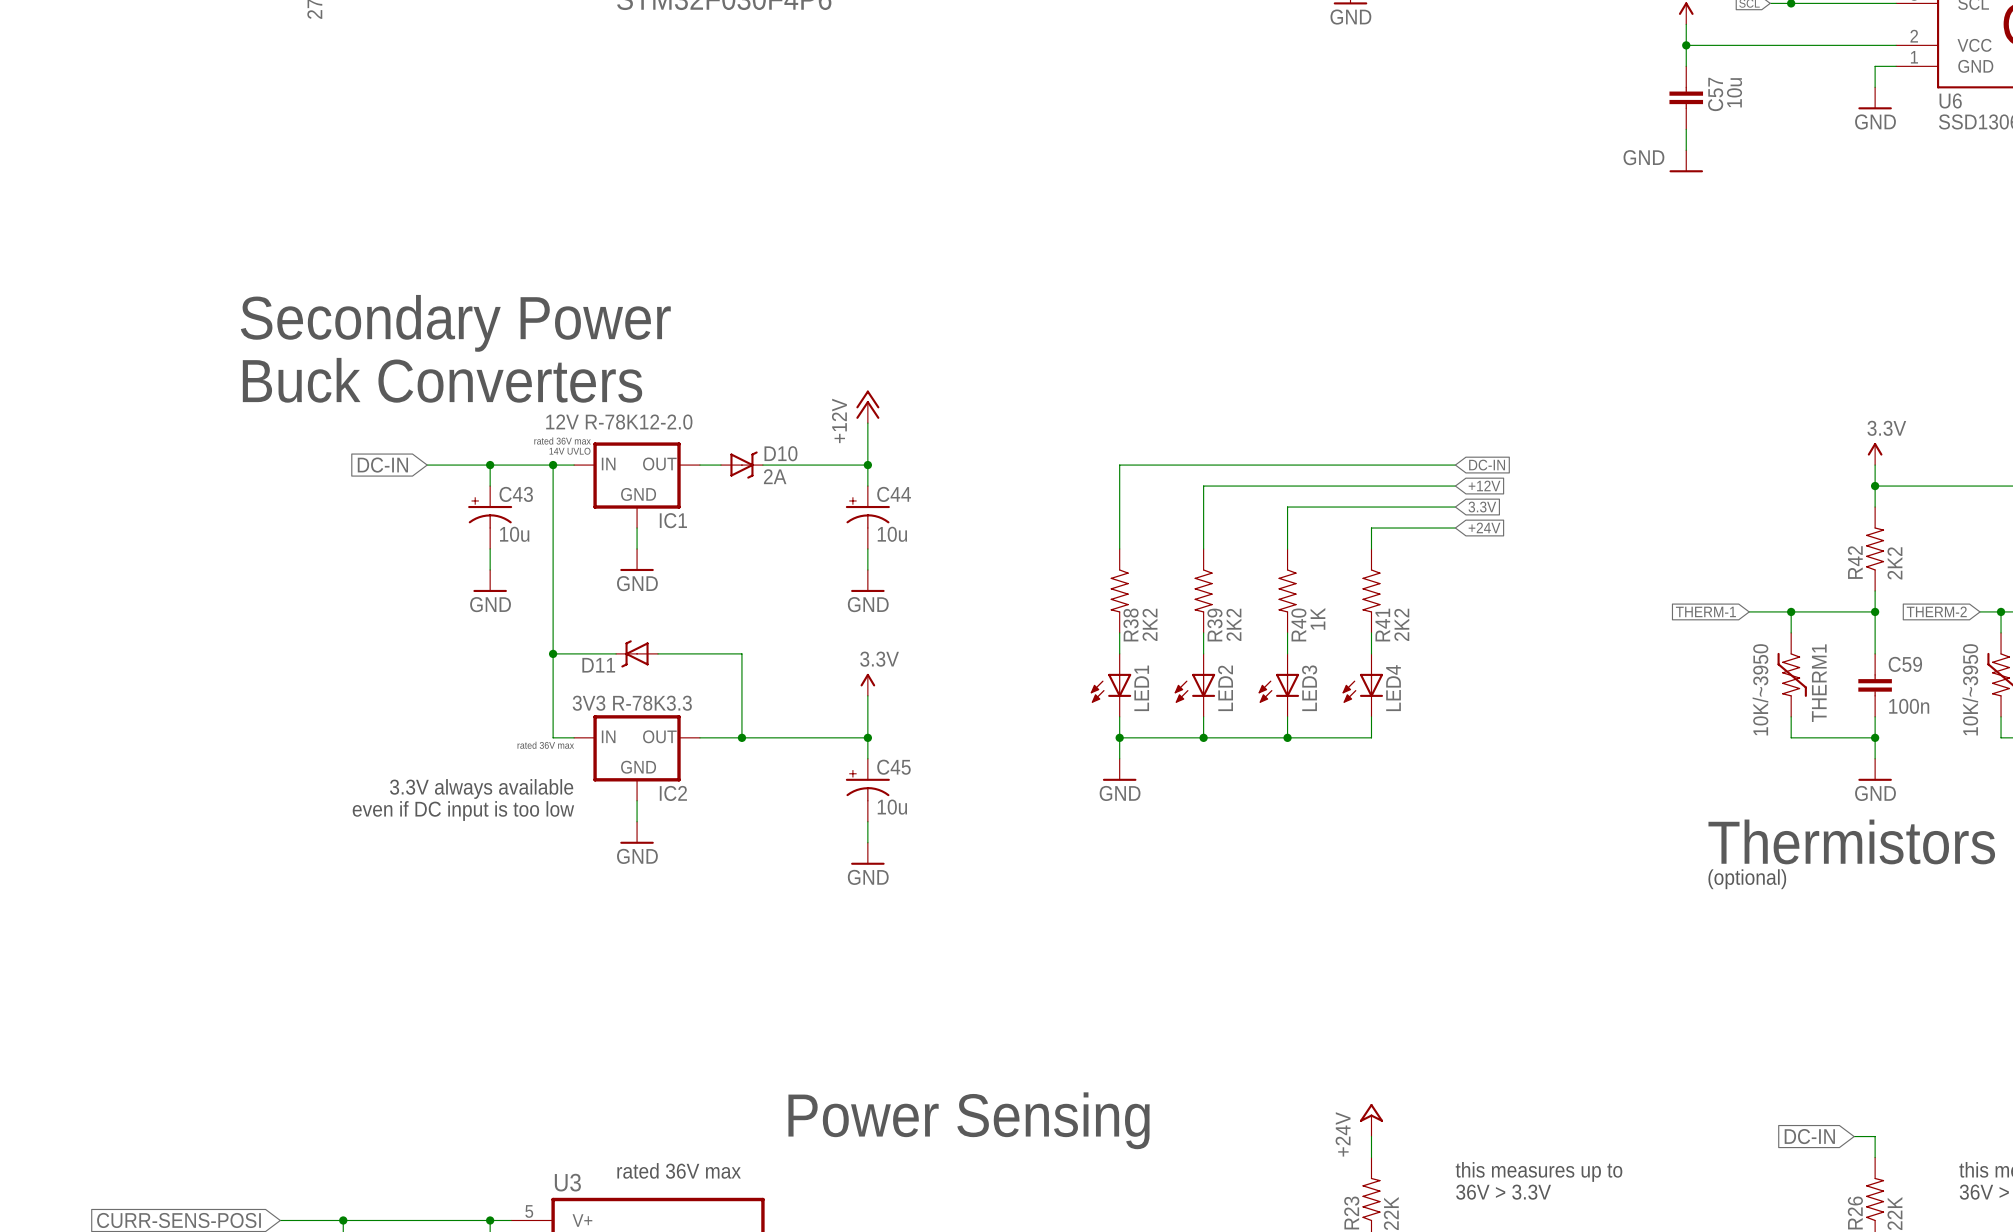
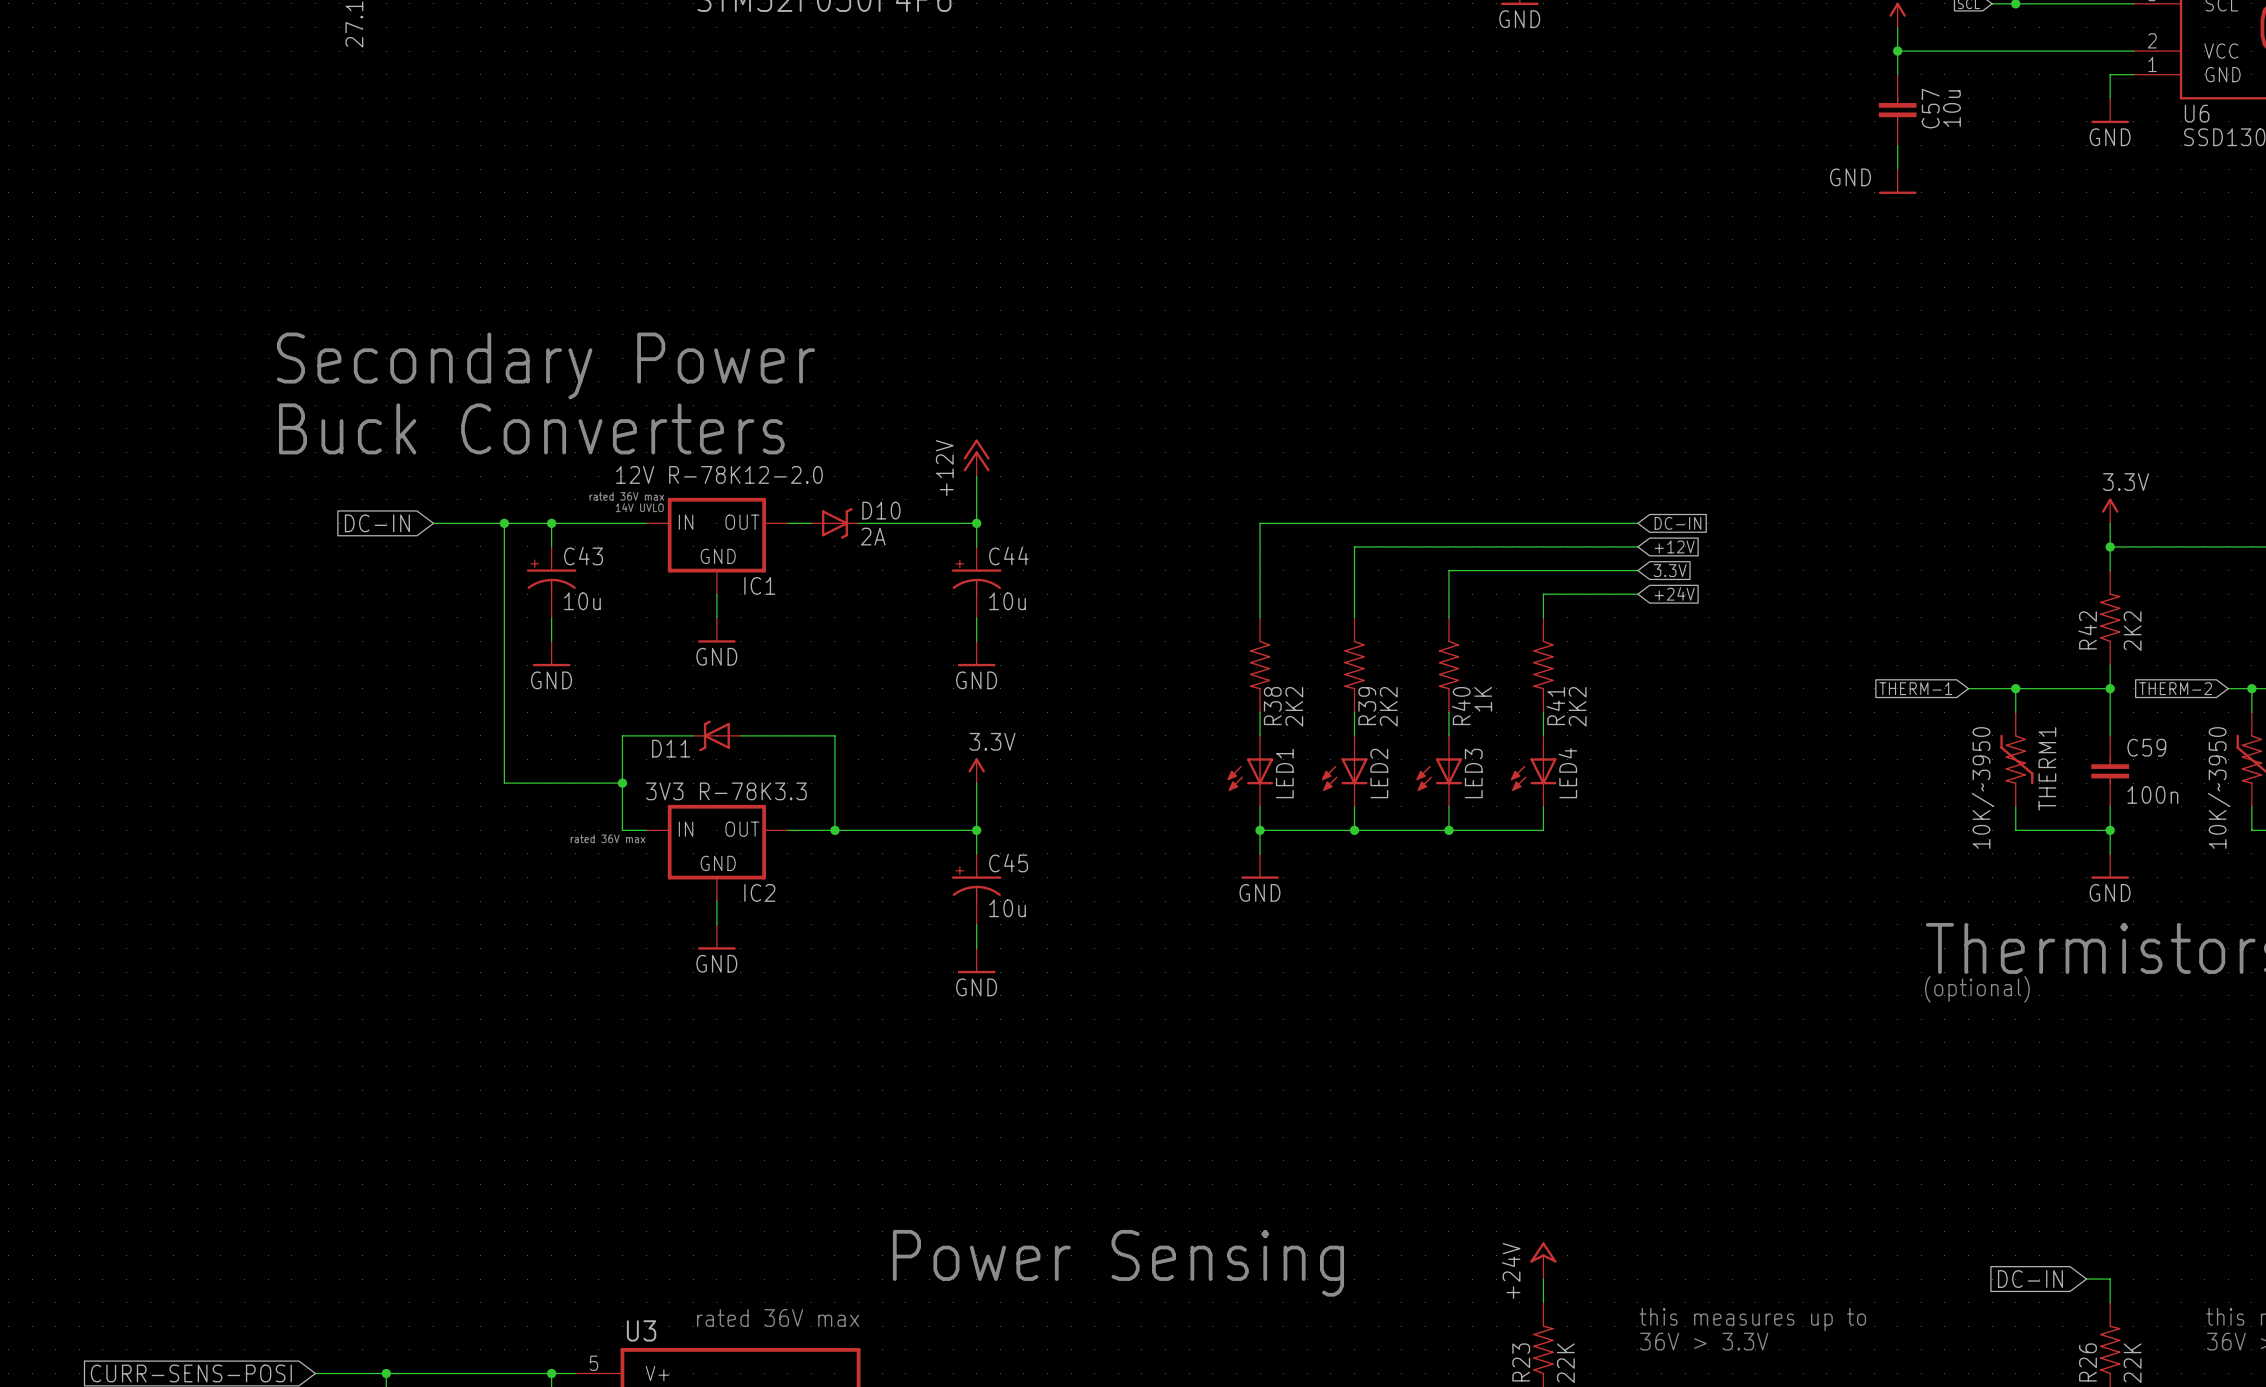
global label position: DC-IN (382, 465) -> DC-IN (377, 523)
wire: none -> (433, 523) (480, 523)
wire: none -> (504, 523) (504, 783) (622, 783)
junction: none -> (504, 523)
wire: (553, 465) (553, 653) -> none
junction: (553, 465) -> none
junction position: (553, 653) -> (622, 783)
text: 3.3V always available (481, 788) -> none
text: even if DC input is too low (463, 811) -> none

